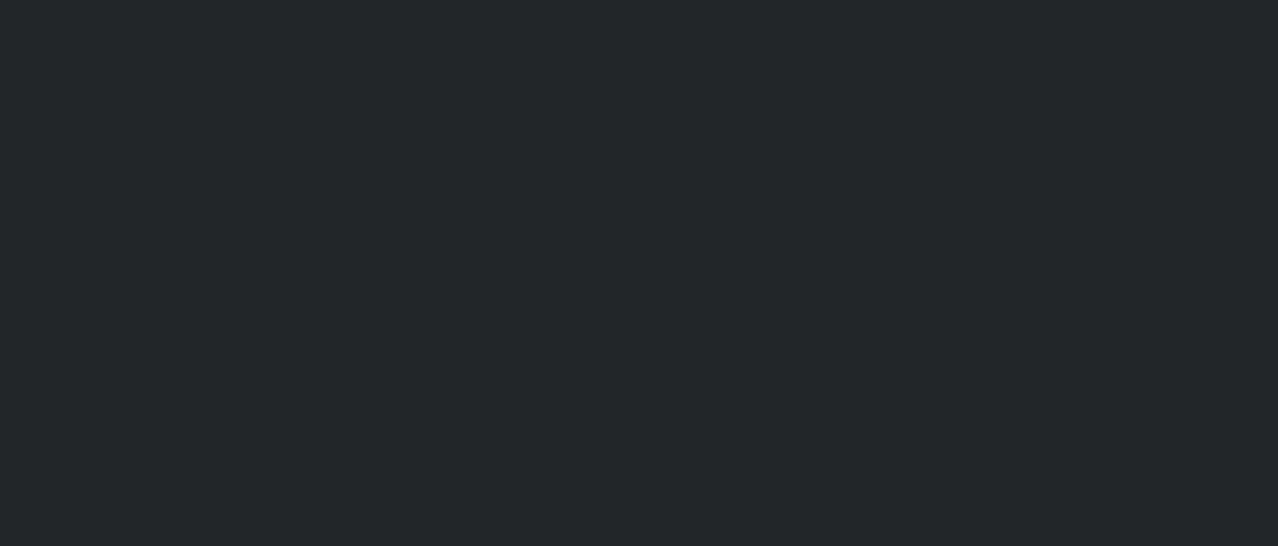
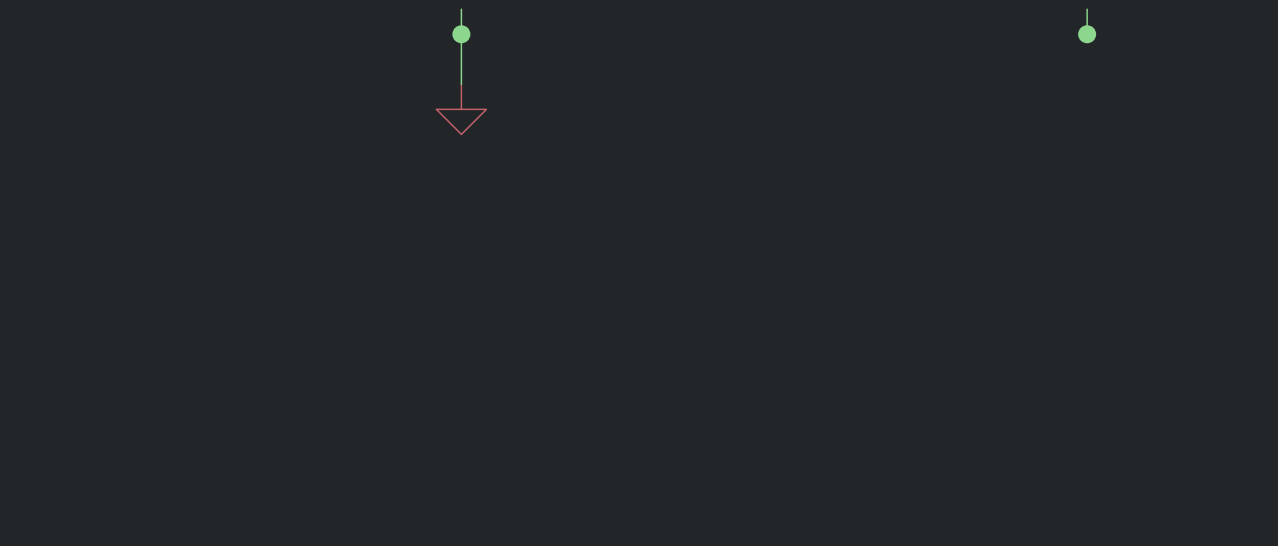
wire: none -> (461, 9) (461, 84)
wire: none -> (1087, 9) (1087, 34)
junction: none -> (461, 34)
junction: none -> (1087, 34)
power symbol: none -> (461, 109)

